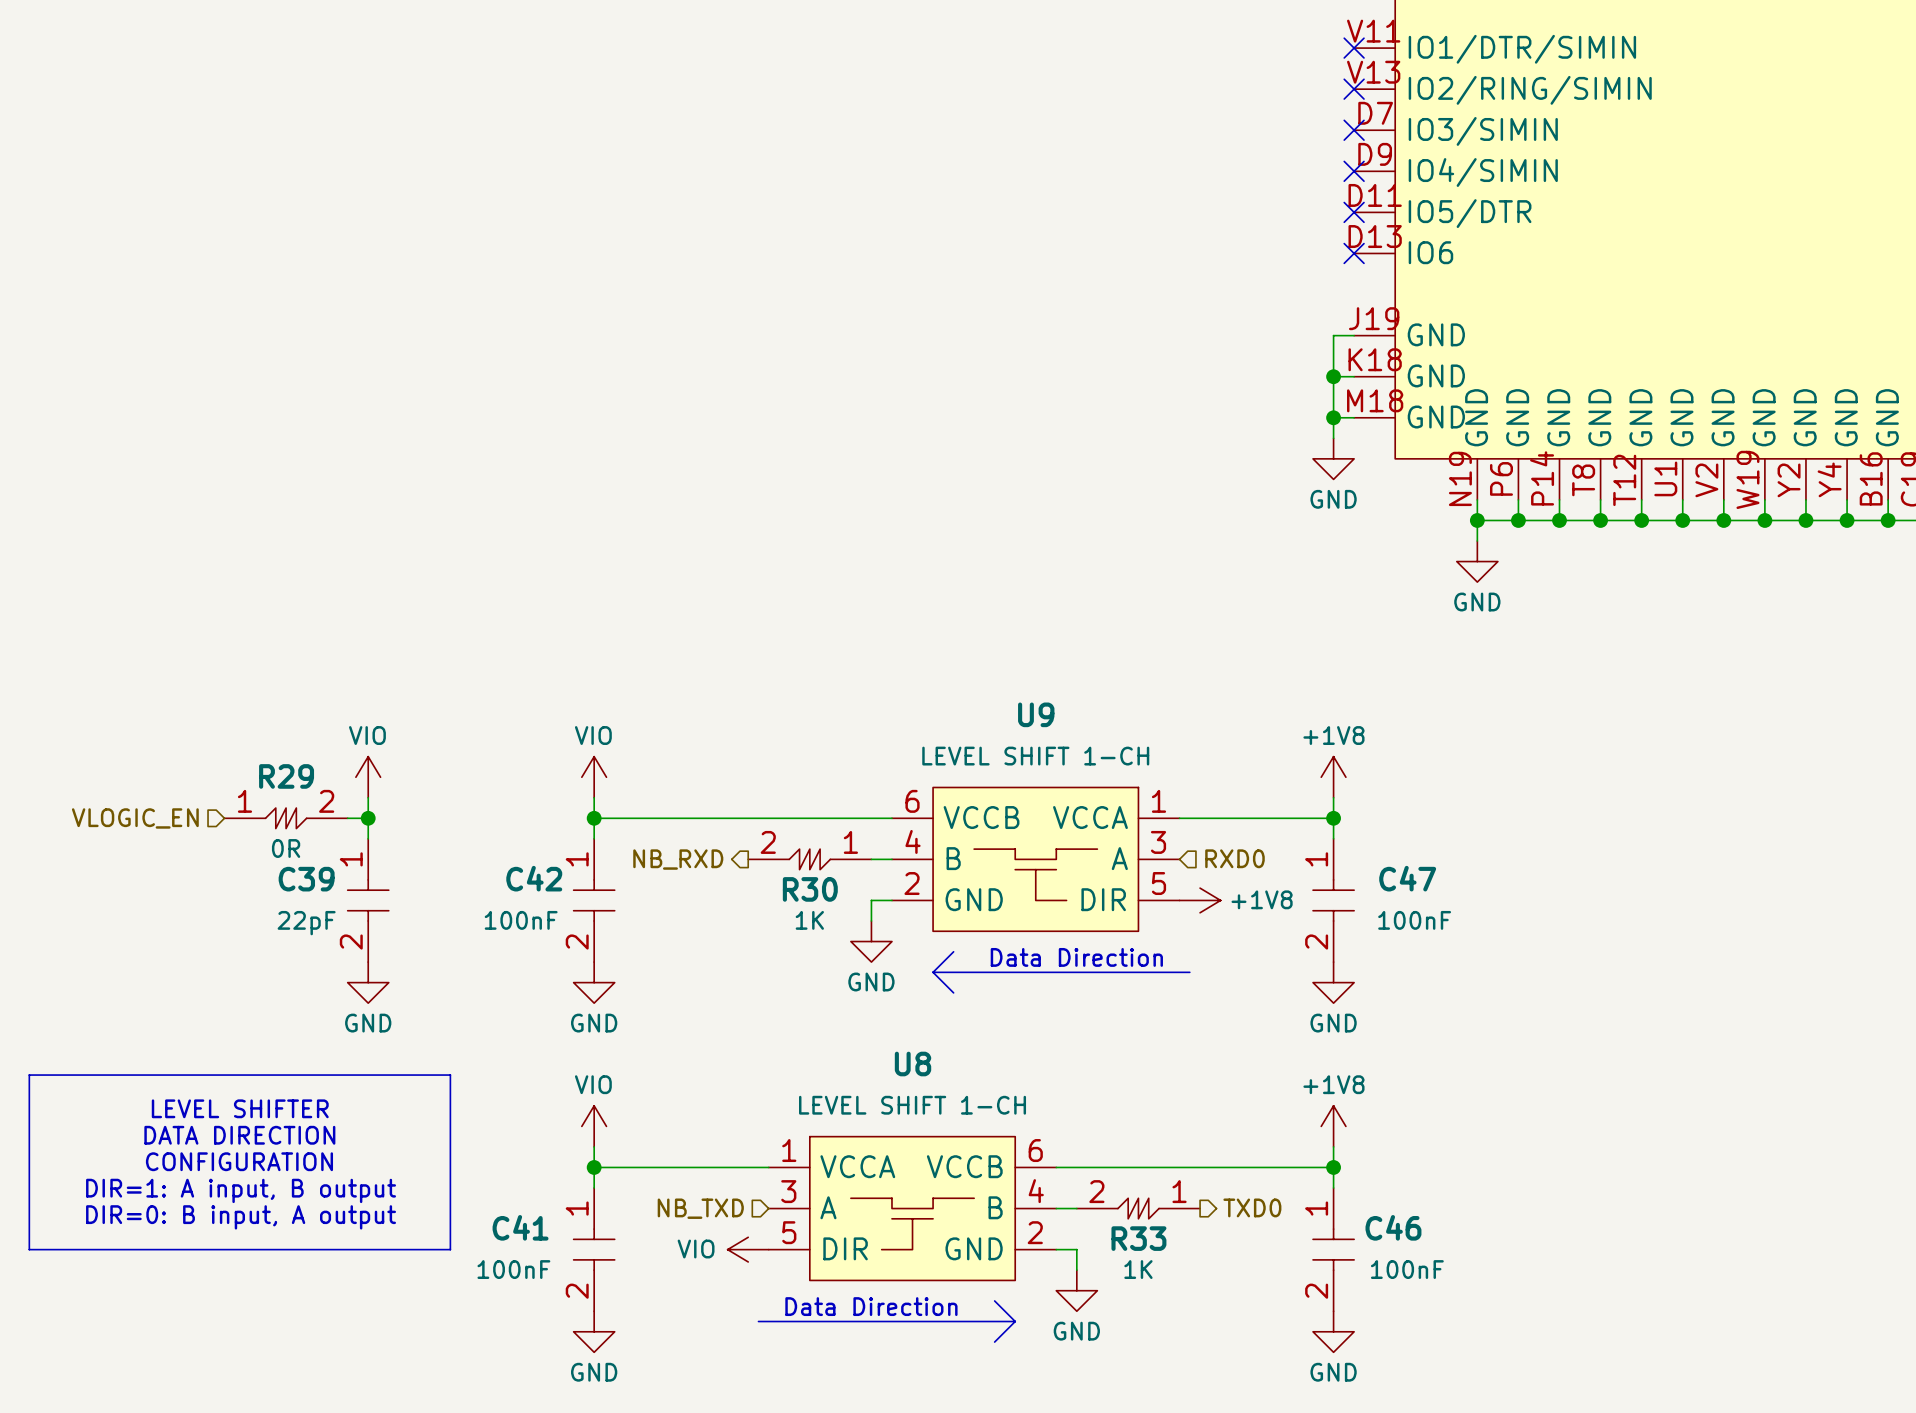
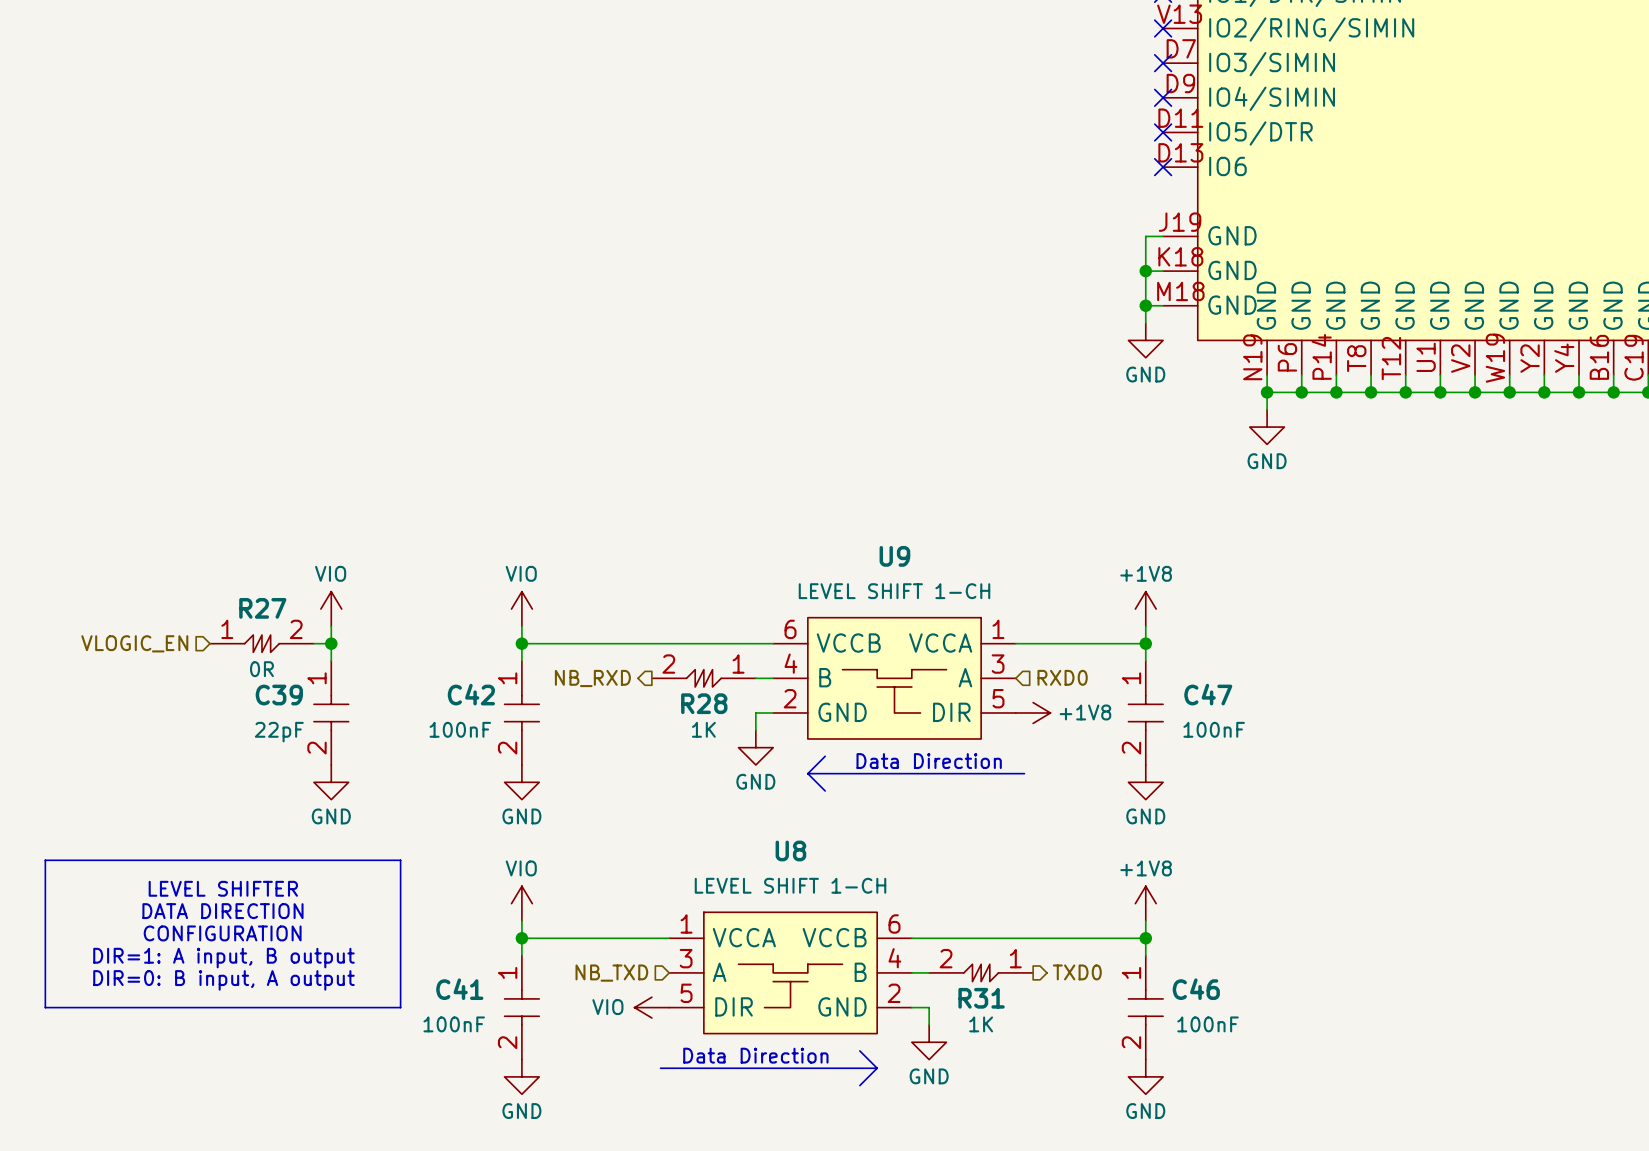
R29 name: R29 (286, 776) -> R27 (262, 608)
R30 name: R30 (810, 889) -> R28 (704, 703)
R33 name: R33 (1138, 1238) -> R31 (981, 998)

